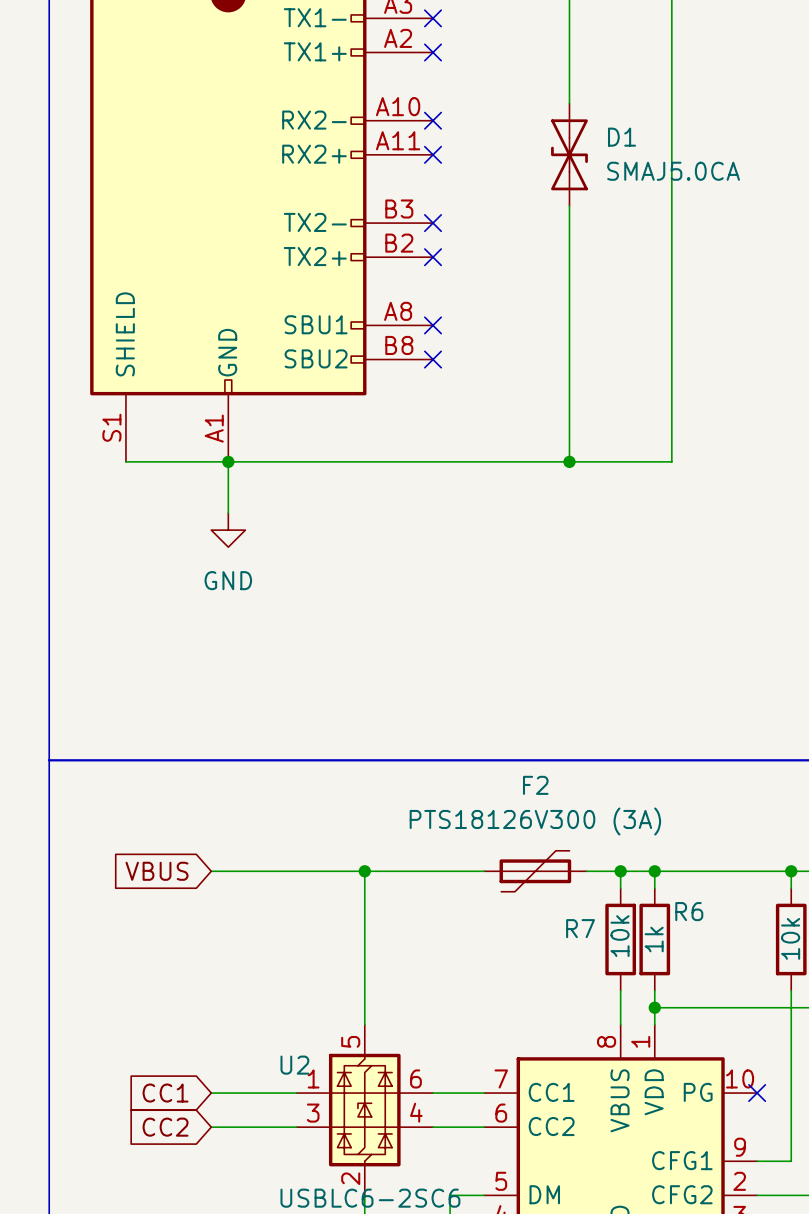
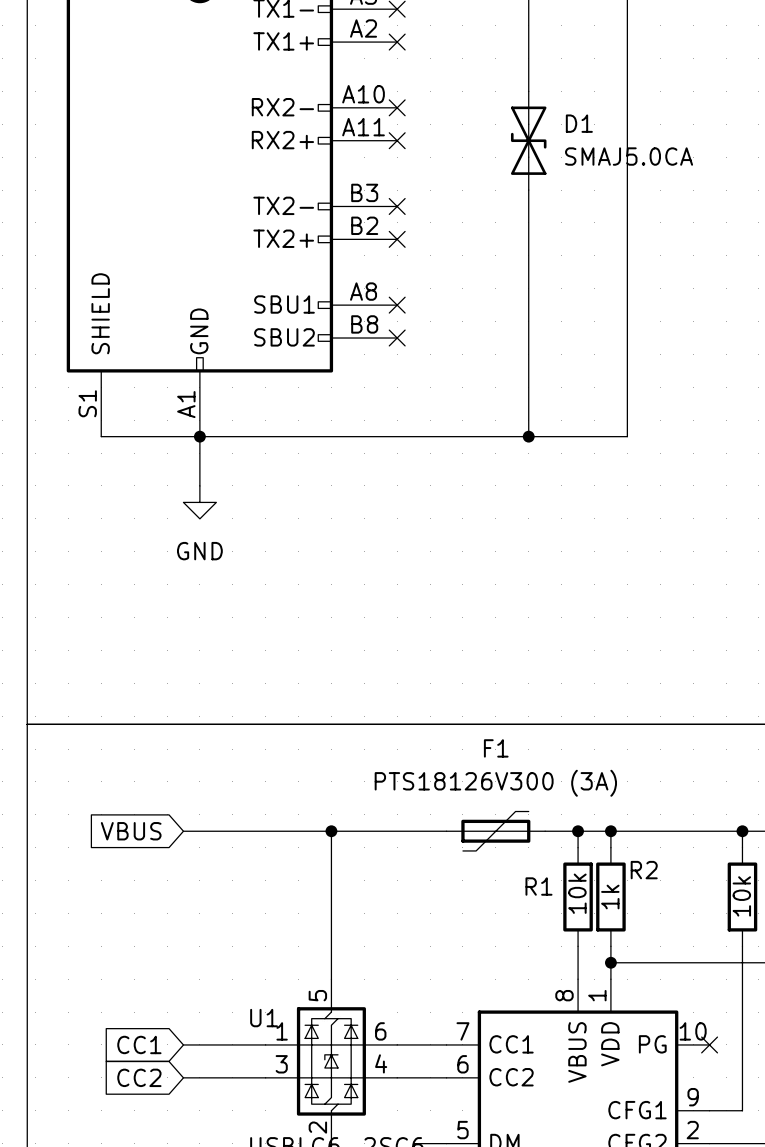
F2 name: F2 (535, 785) -> F1 (496, 748)
R6 name: R6 (689, 911) -> R2 (644, 870)
R7 name: R7 (580, 928) -> R1 (538, 886)
U2 name: U2 (294, 1065) -> U1 (264, 1018)

